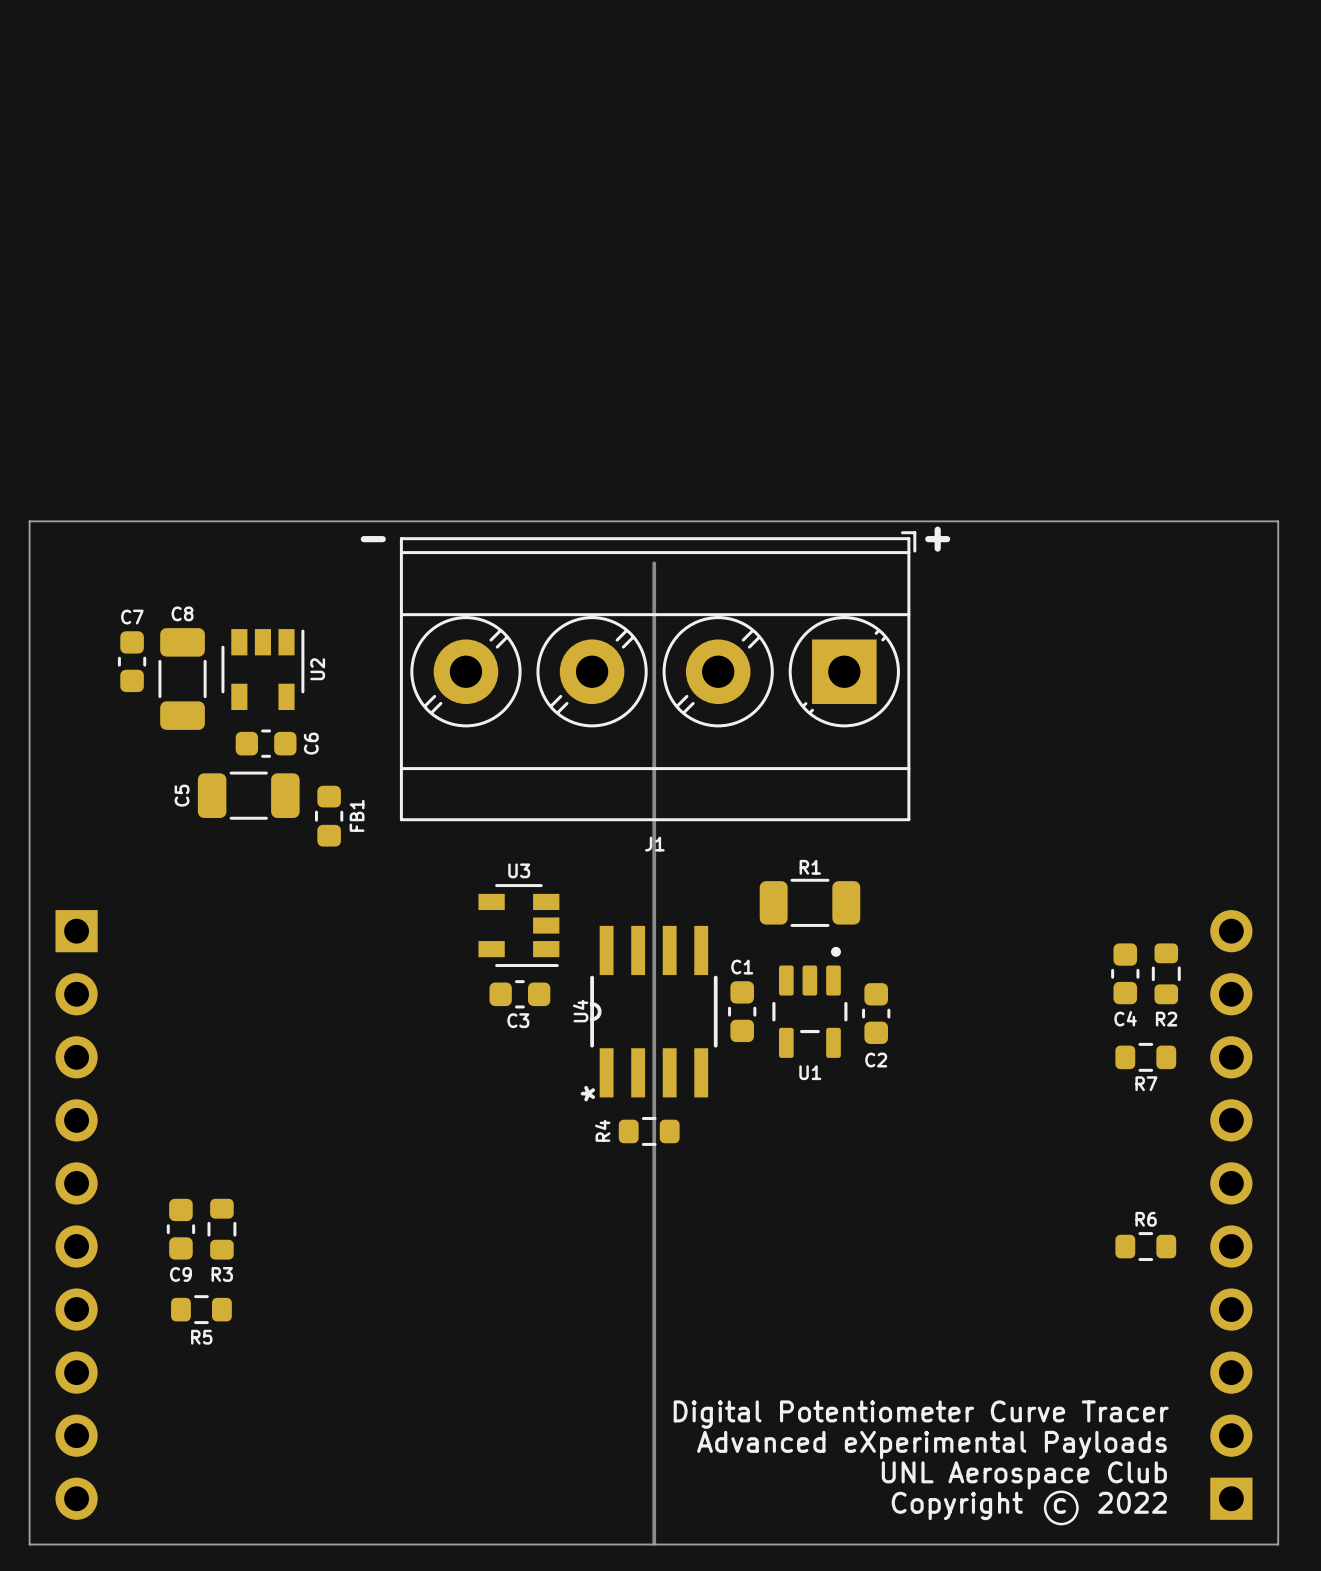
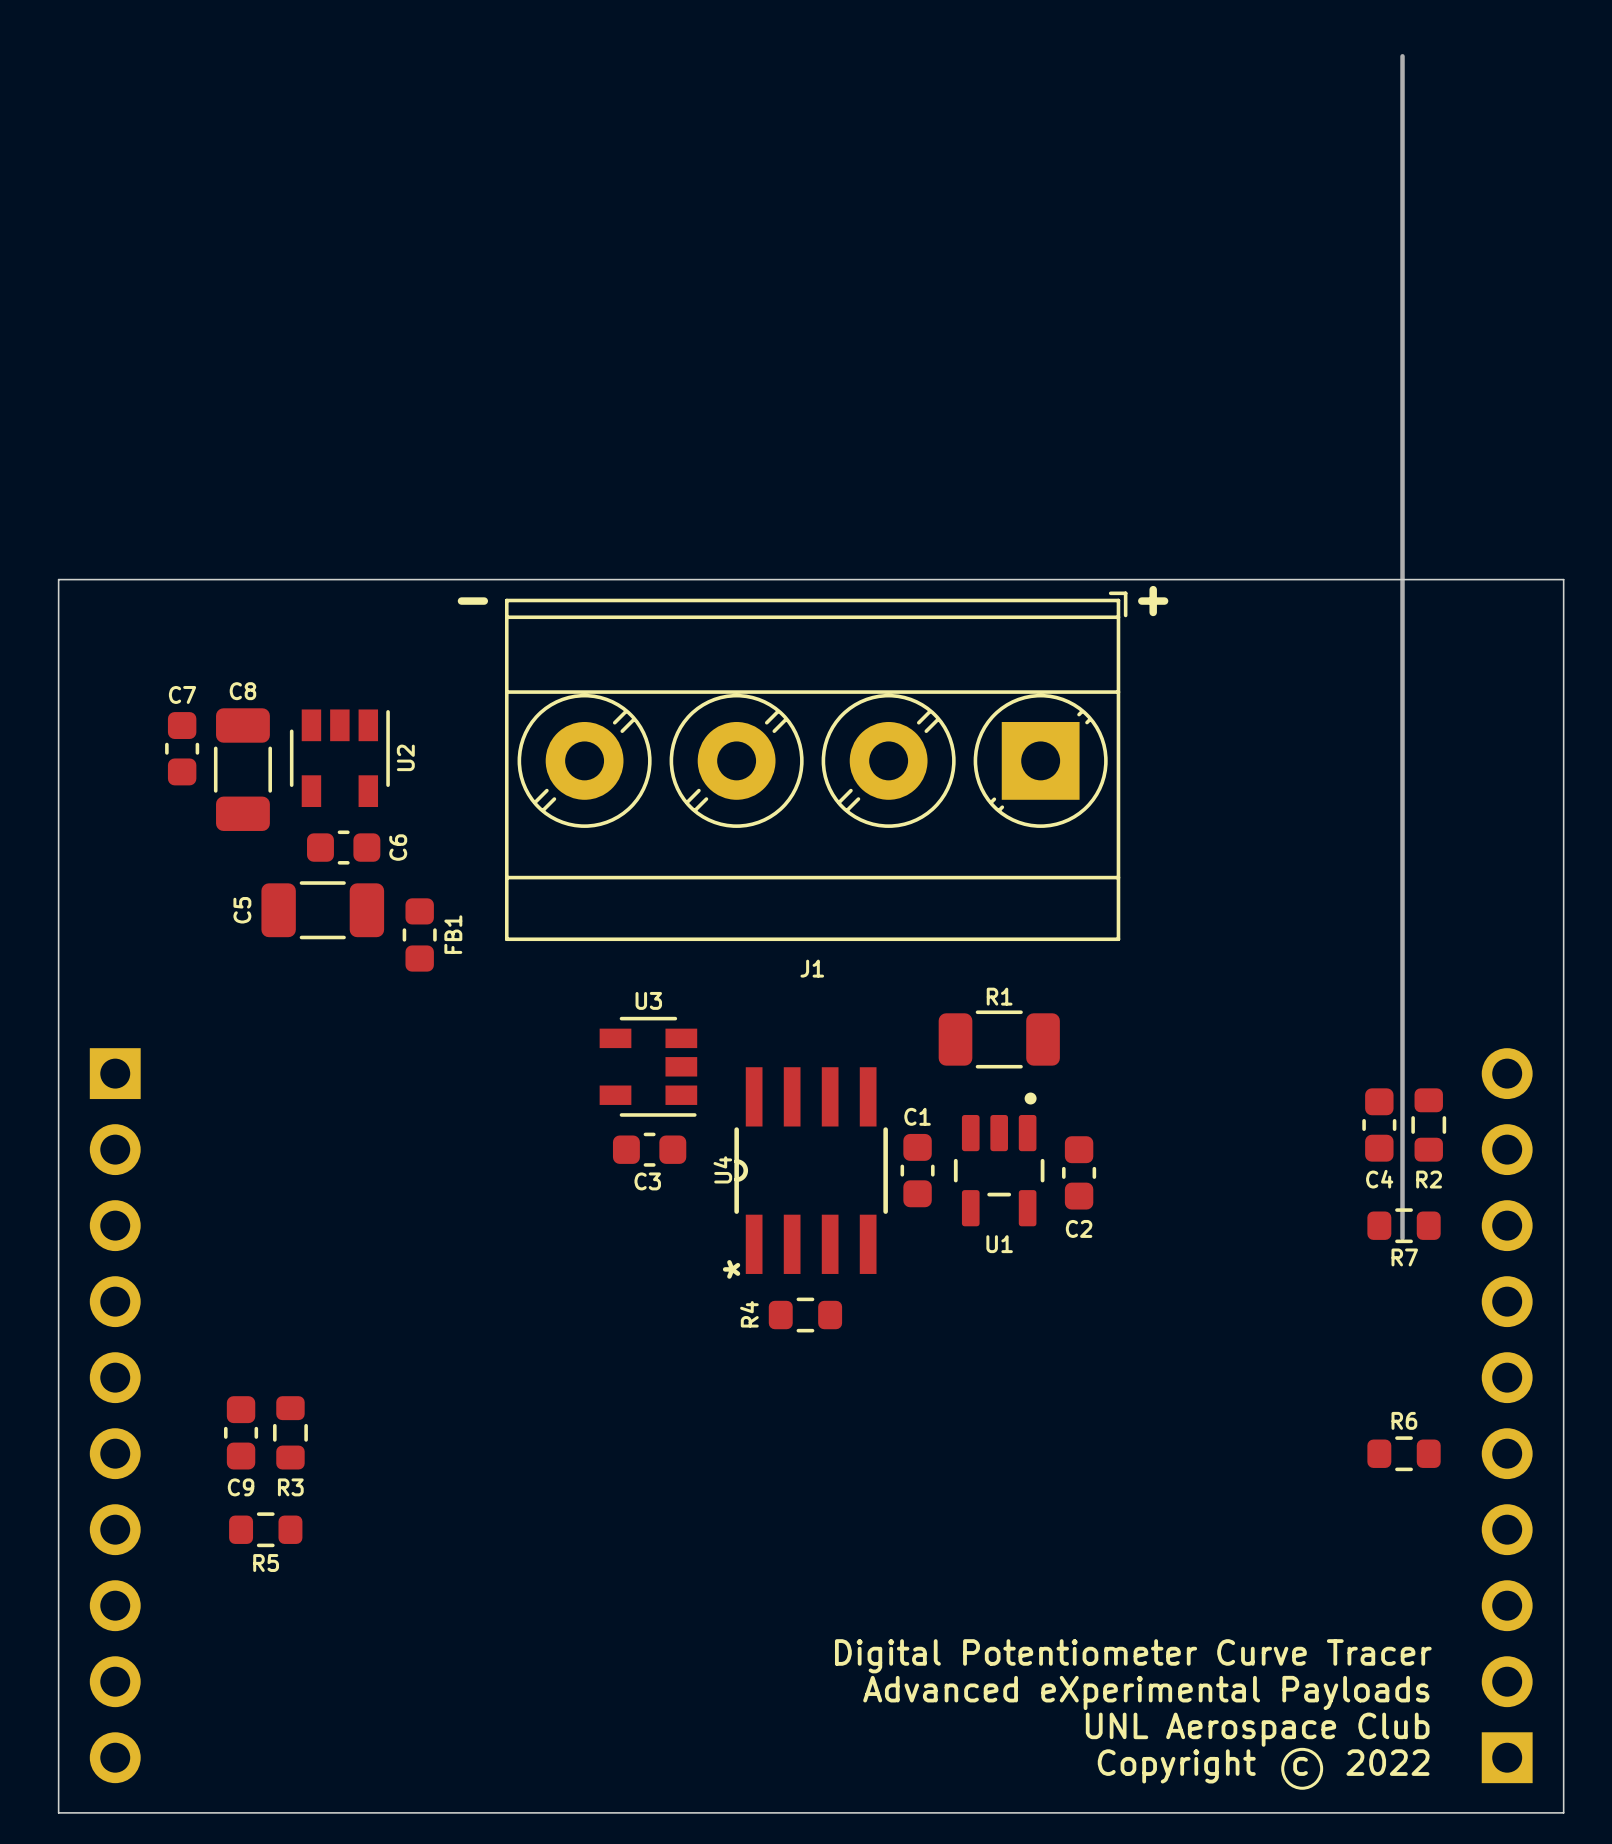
line: none -> (1402, 56) (1402, 1238)
line: (654, 563) (654, 1543) -> none

